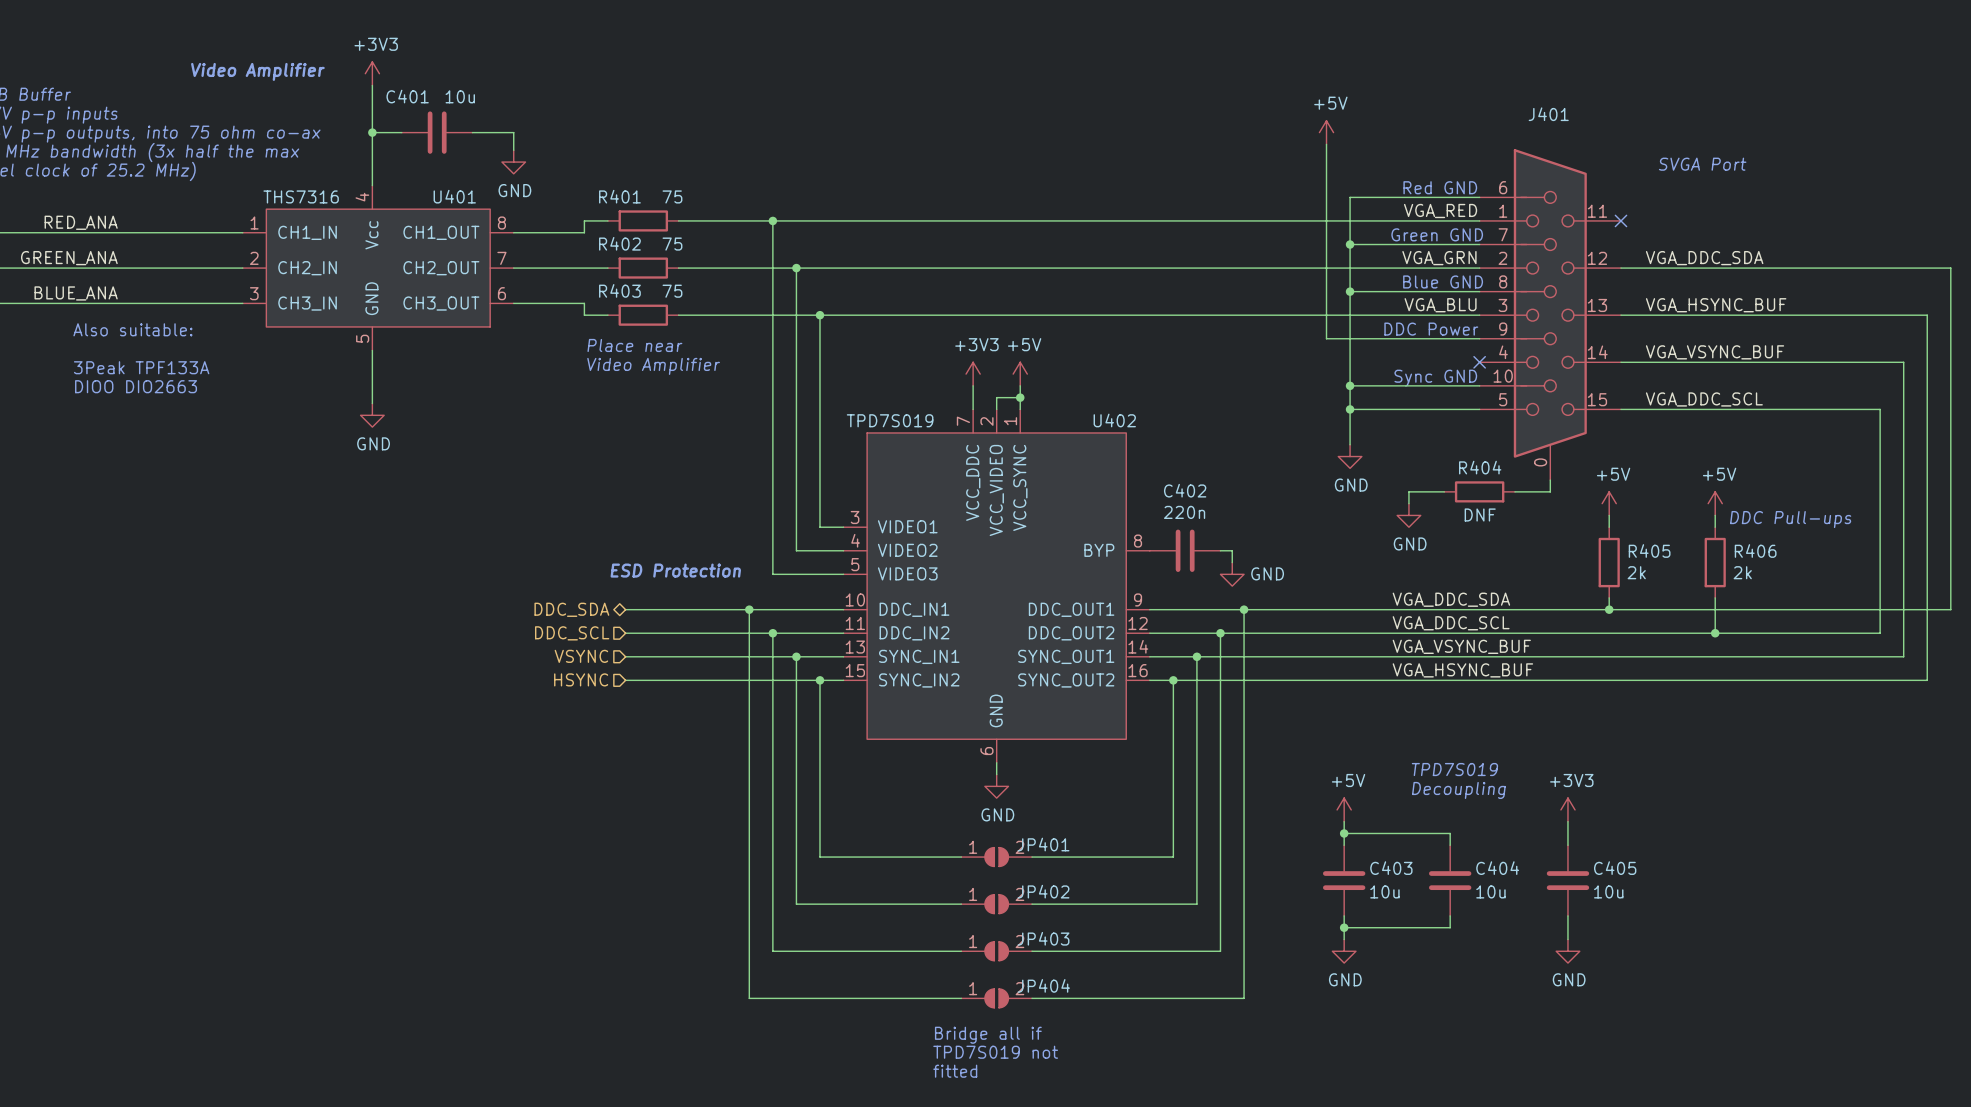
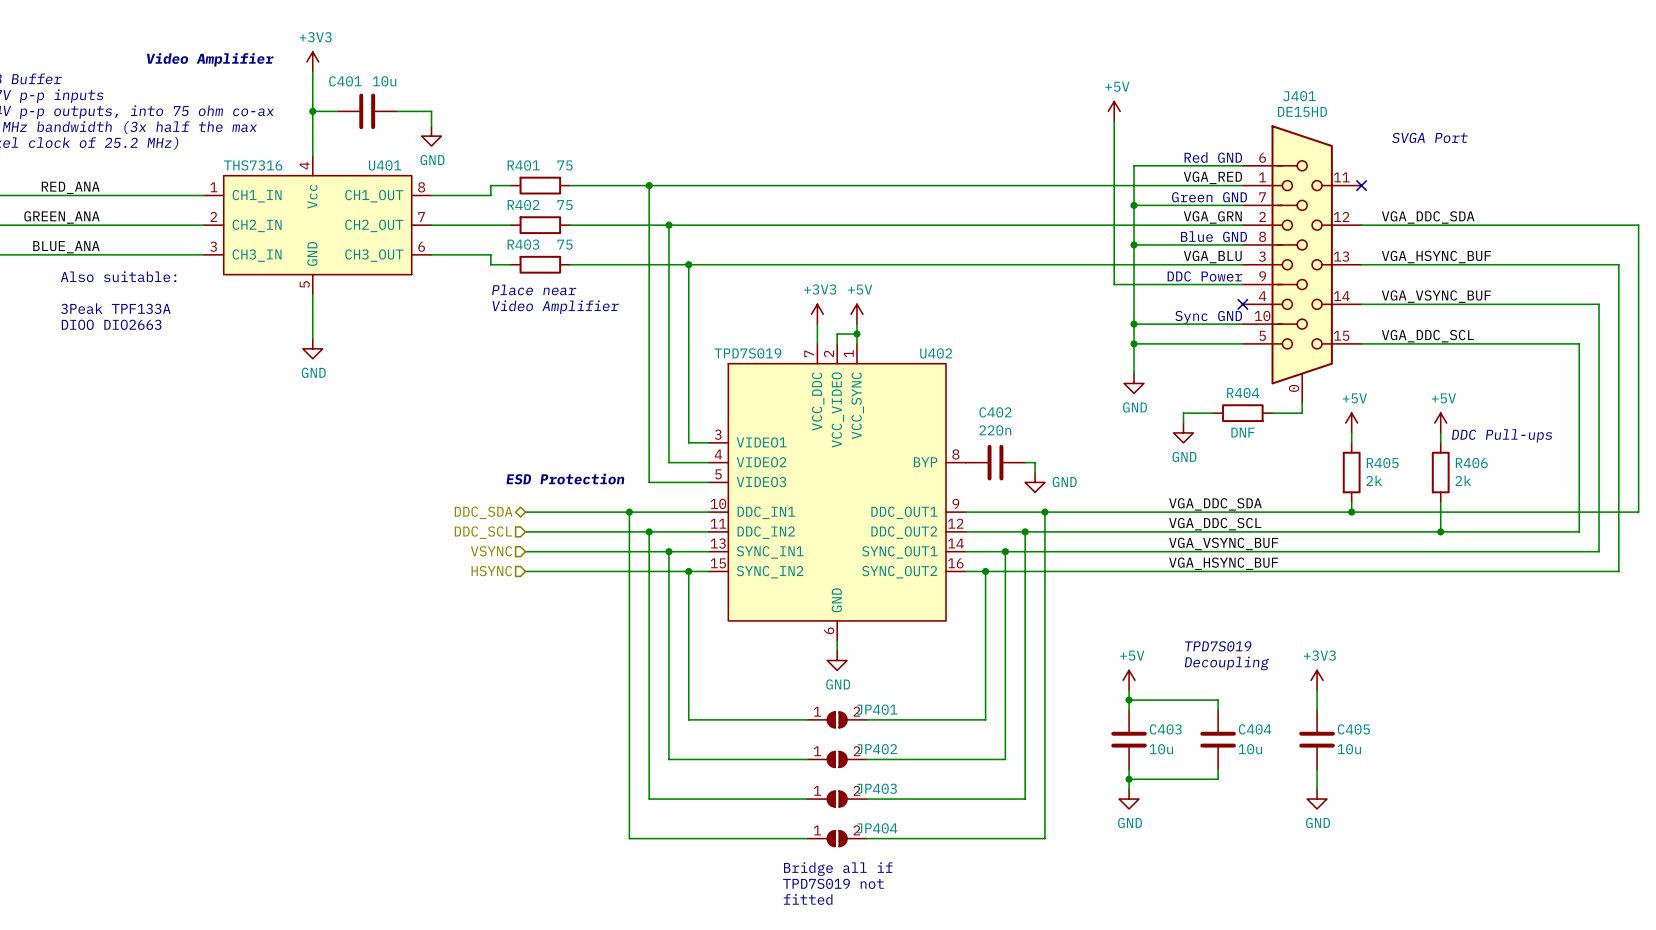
J401 value: none -> DE15HD (1302, 111)

